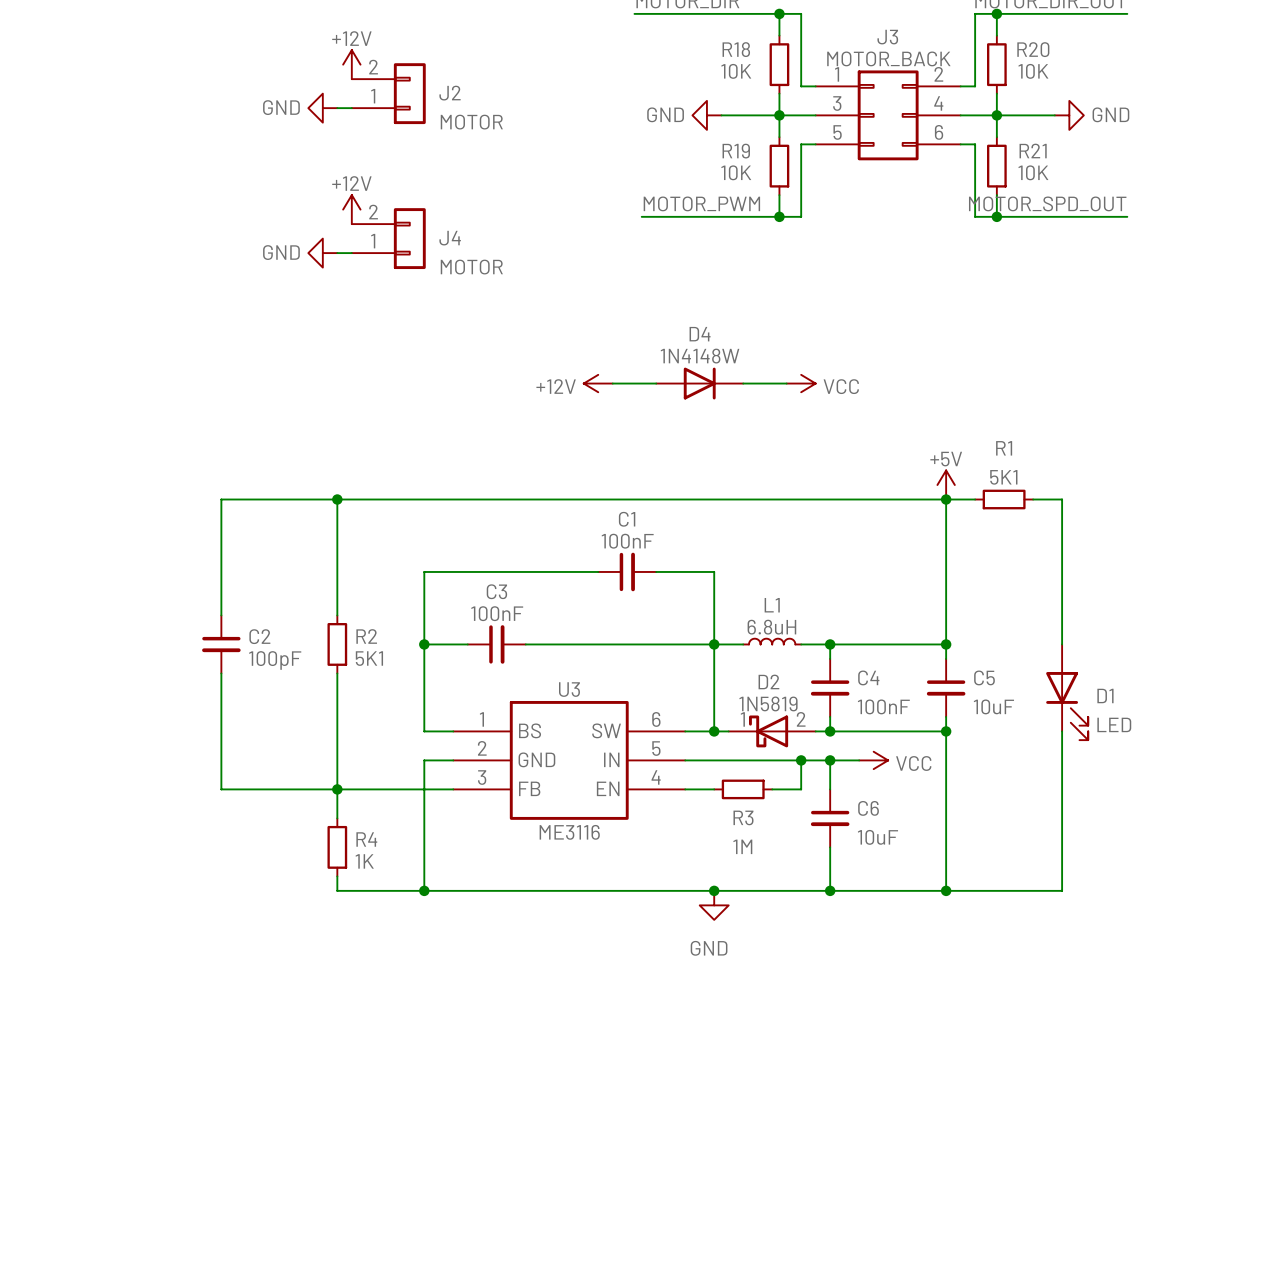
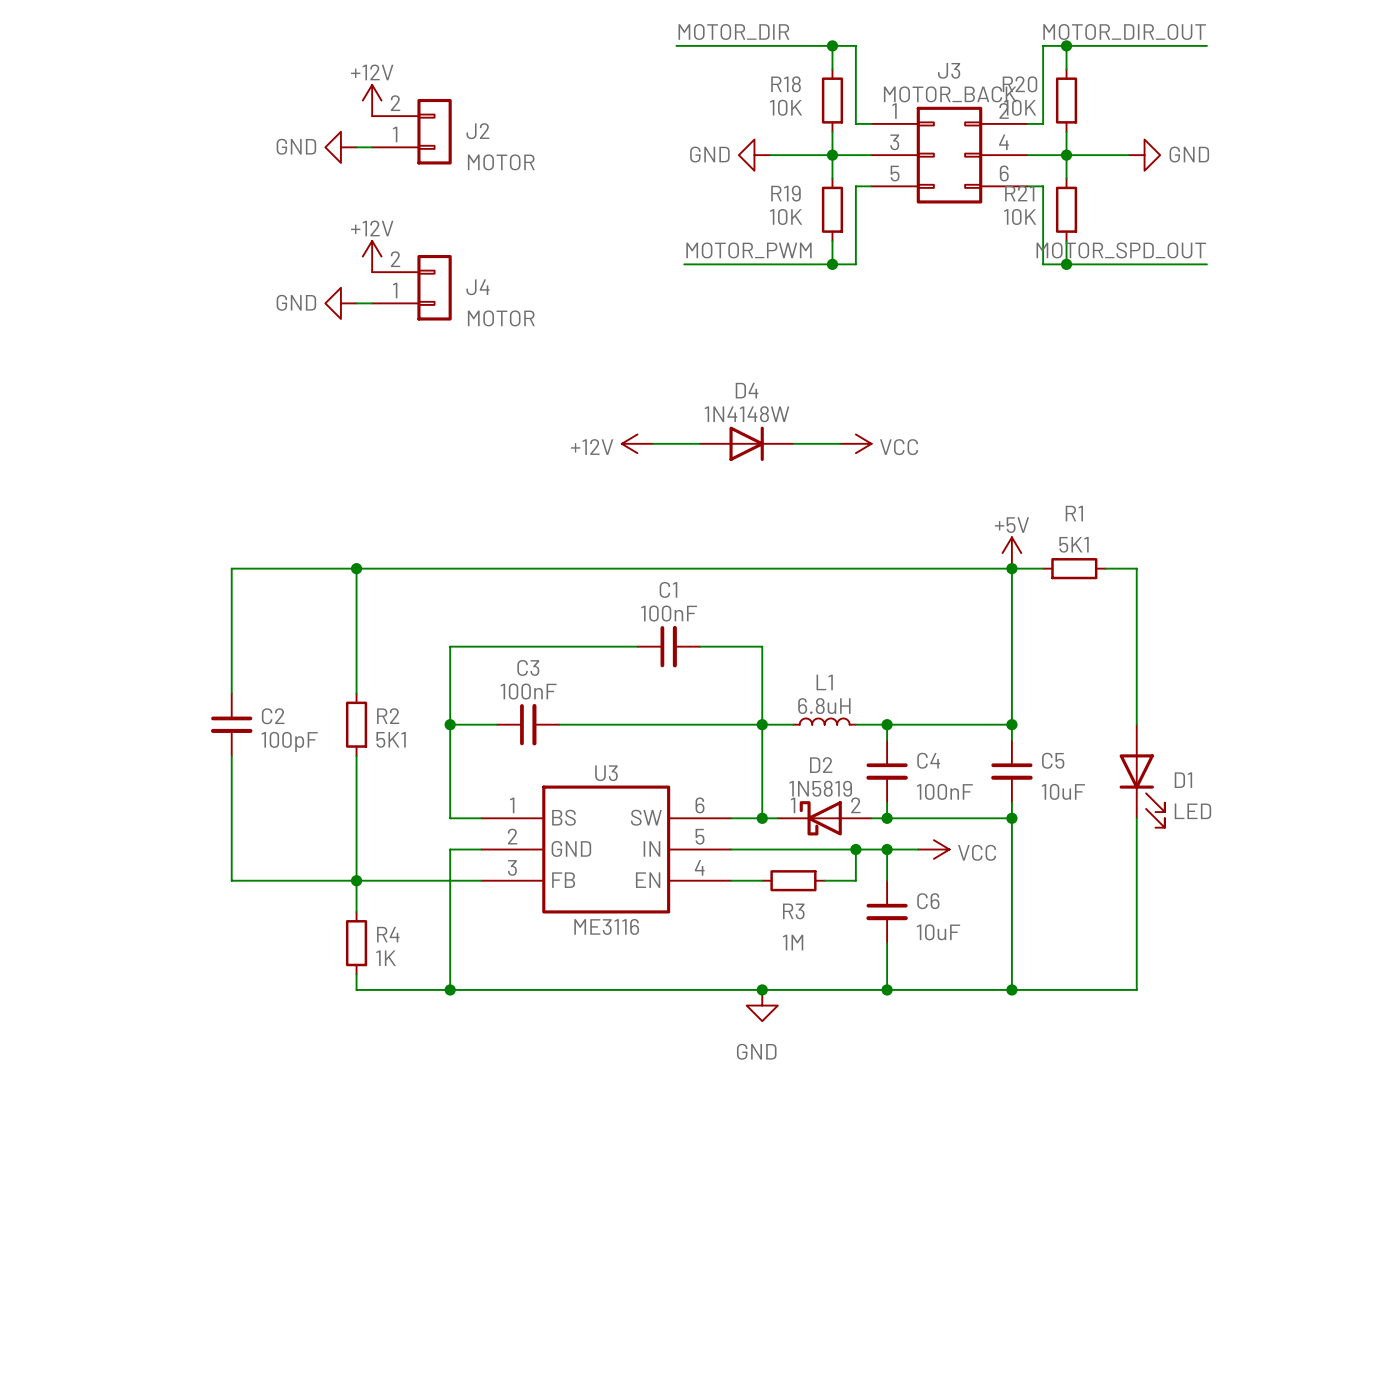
R20 name position: R20 (1033, 49) -> R20 (1019, 84)
R20 value position: 10K (1033, 71) -> 10K (1020, 107)
R21 name position: R21 (1033, 150) -> R21 (1019, 193)
R21 value position: 10K (1033, 172) -> 10K (1020, 216)

